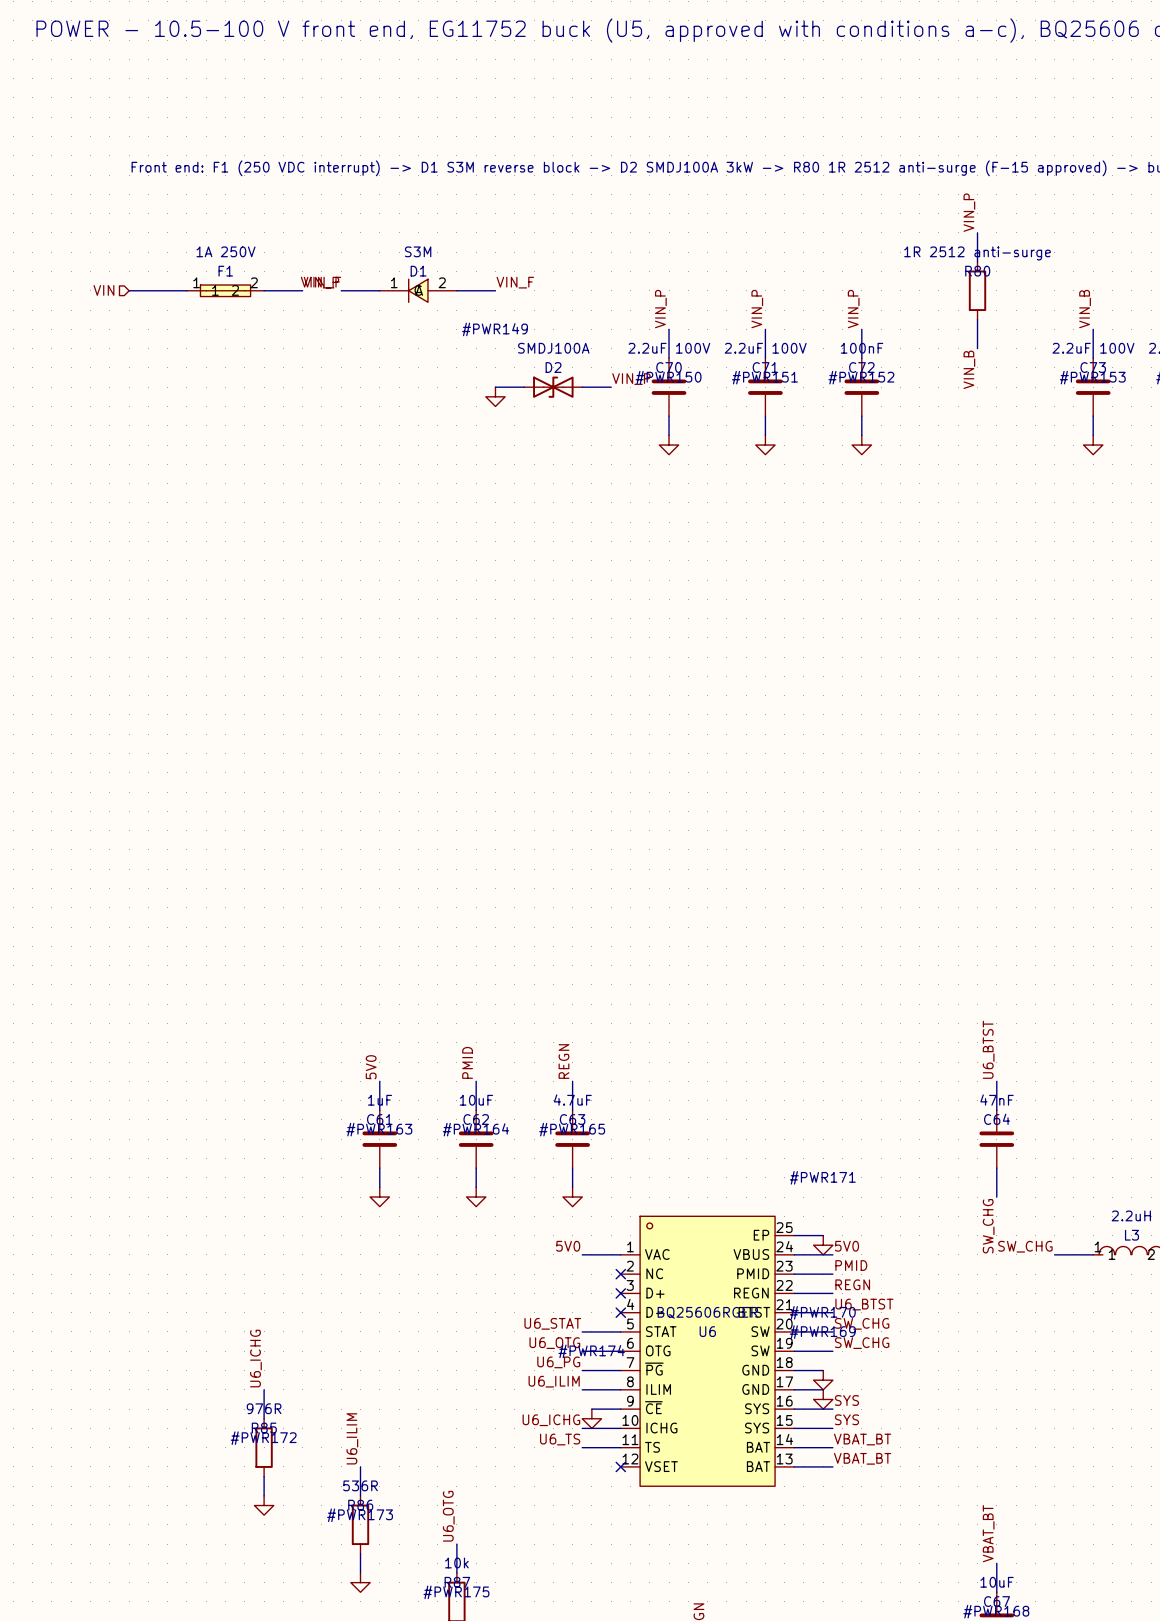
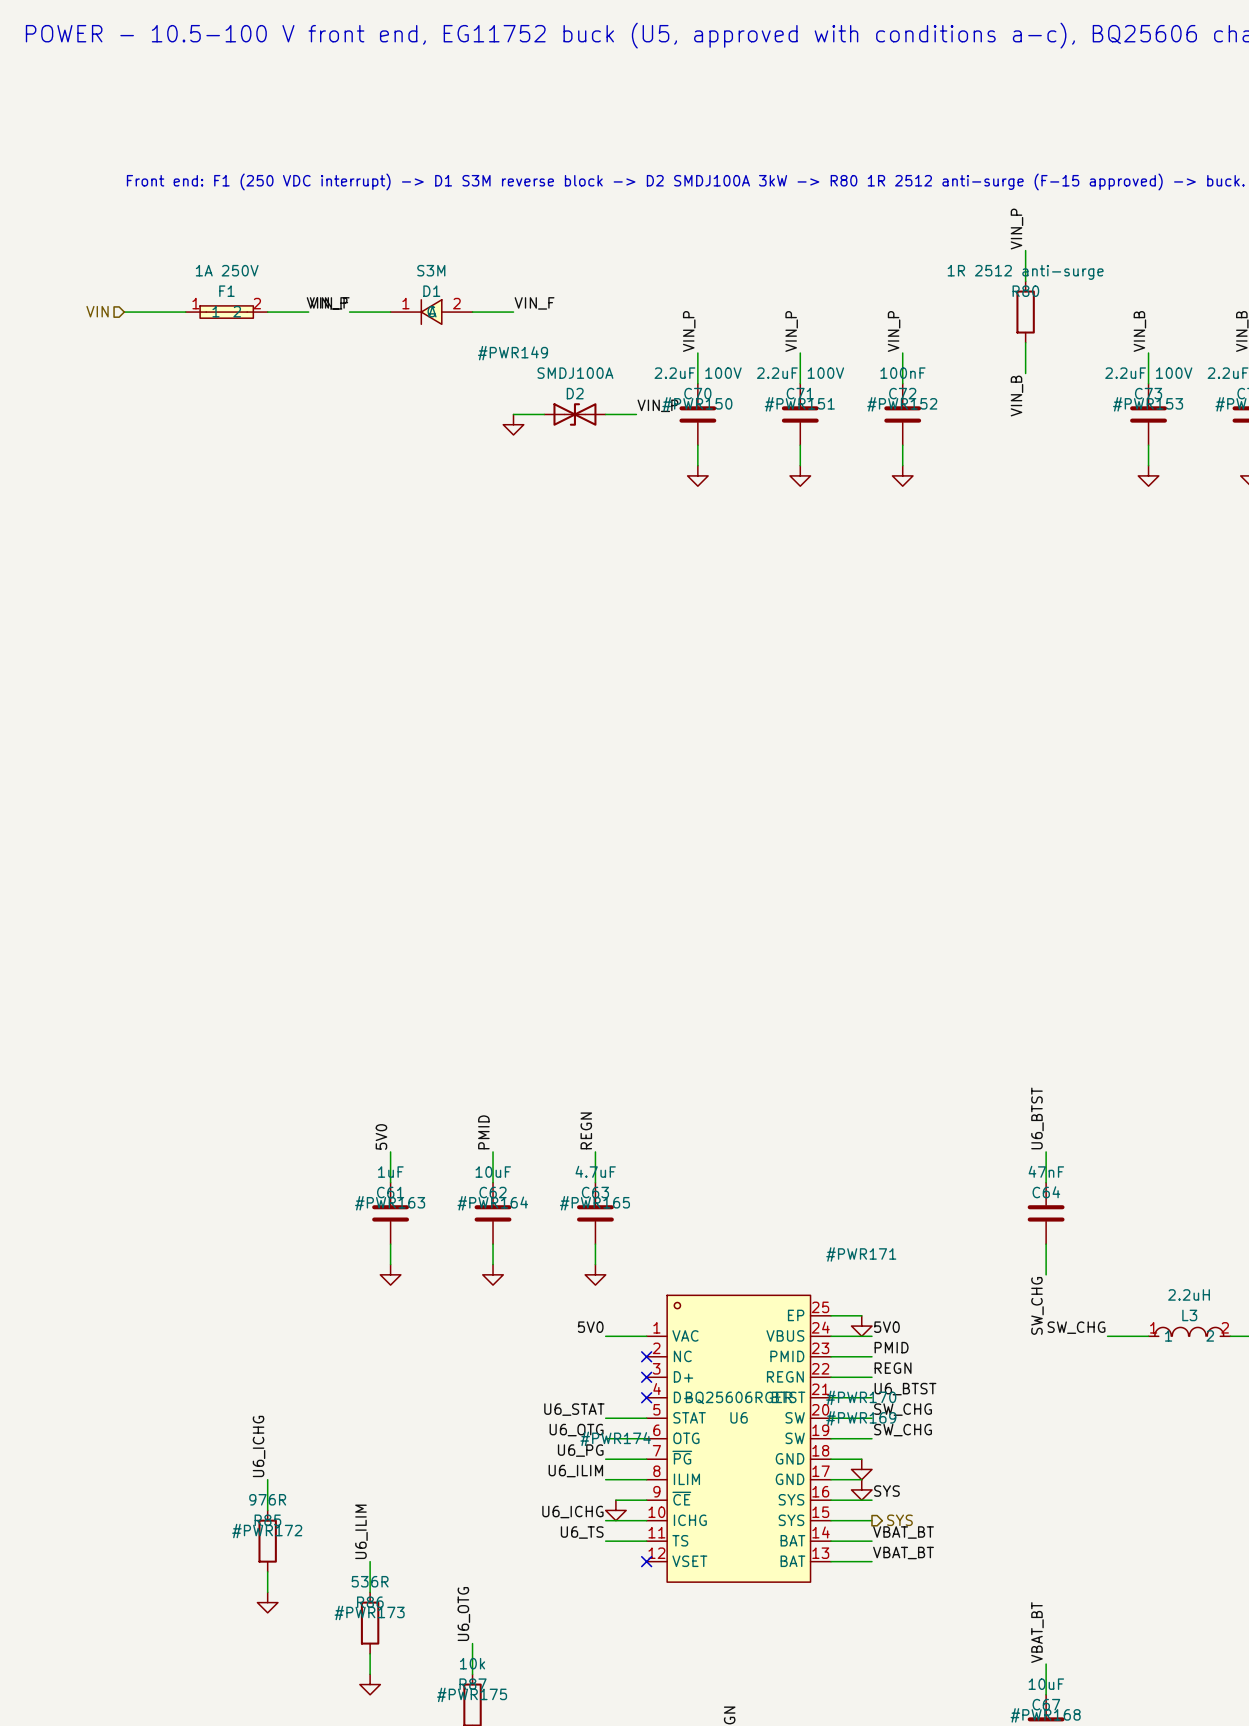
label: SYS (846, 1419) -> none
hierarchical label: none -> SYS (899, 1520)

